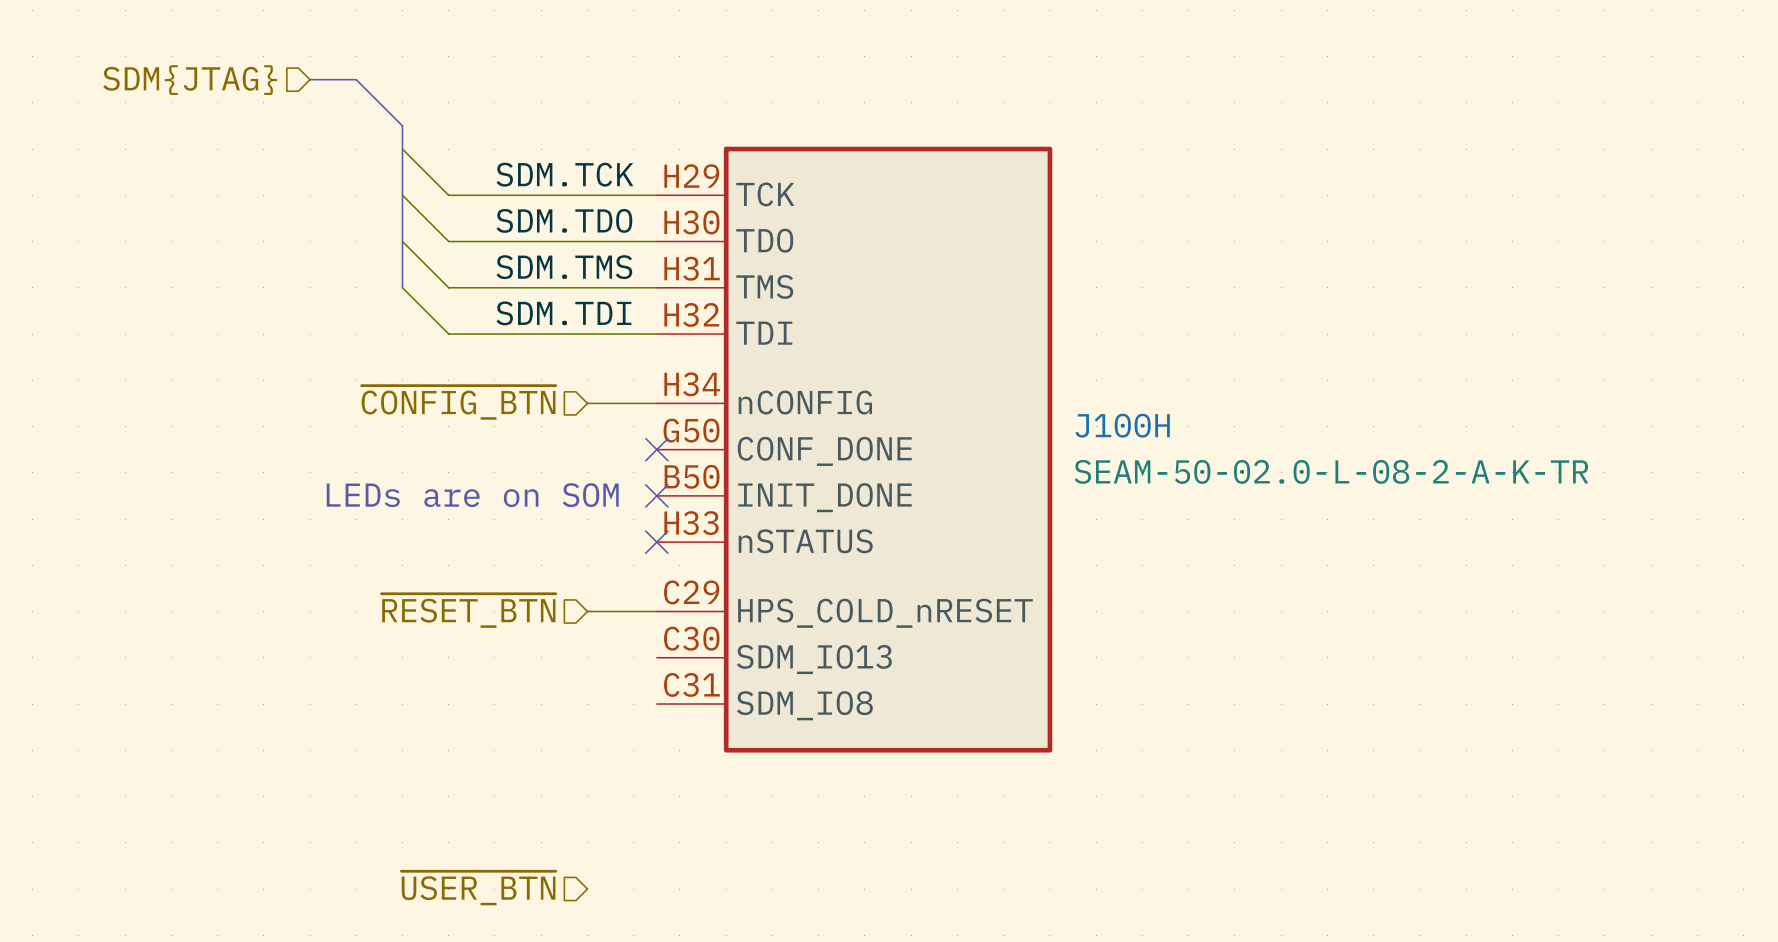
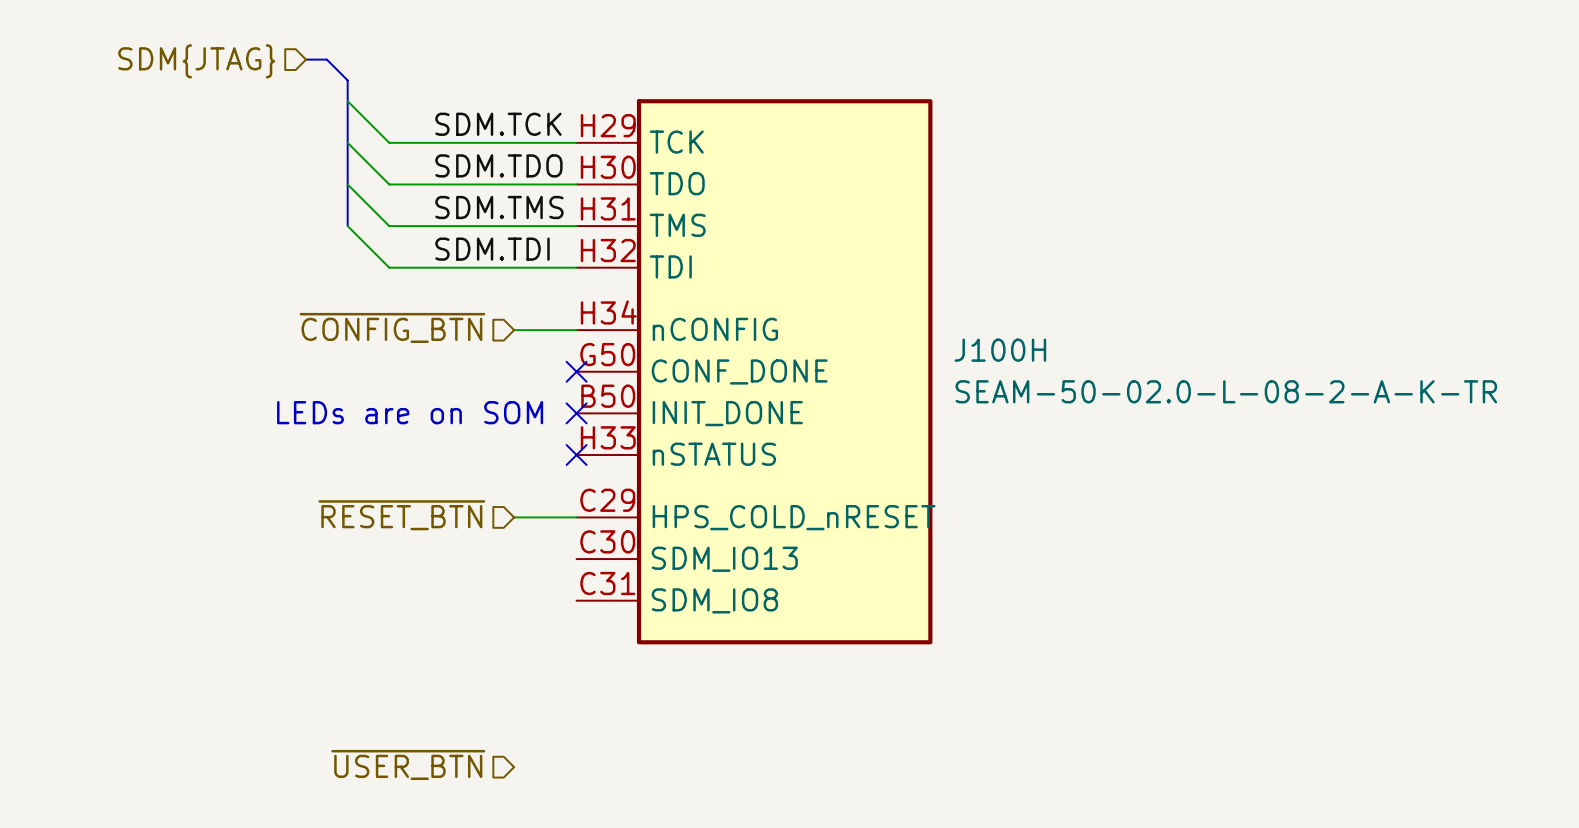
bus: (310, 79) (356, 79) (379, 102) -> (306, 59) (326, 59)
hierarchical label position: SDM{JTAG} (190, 80) -> SDM{JTAG} (196, 61)

